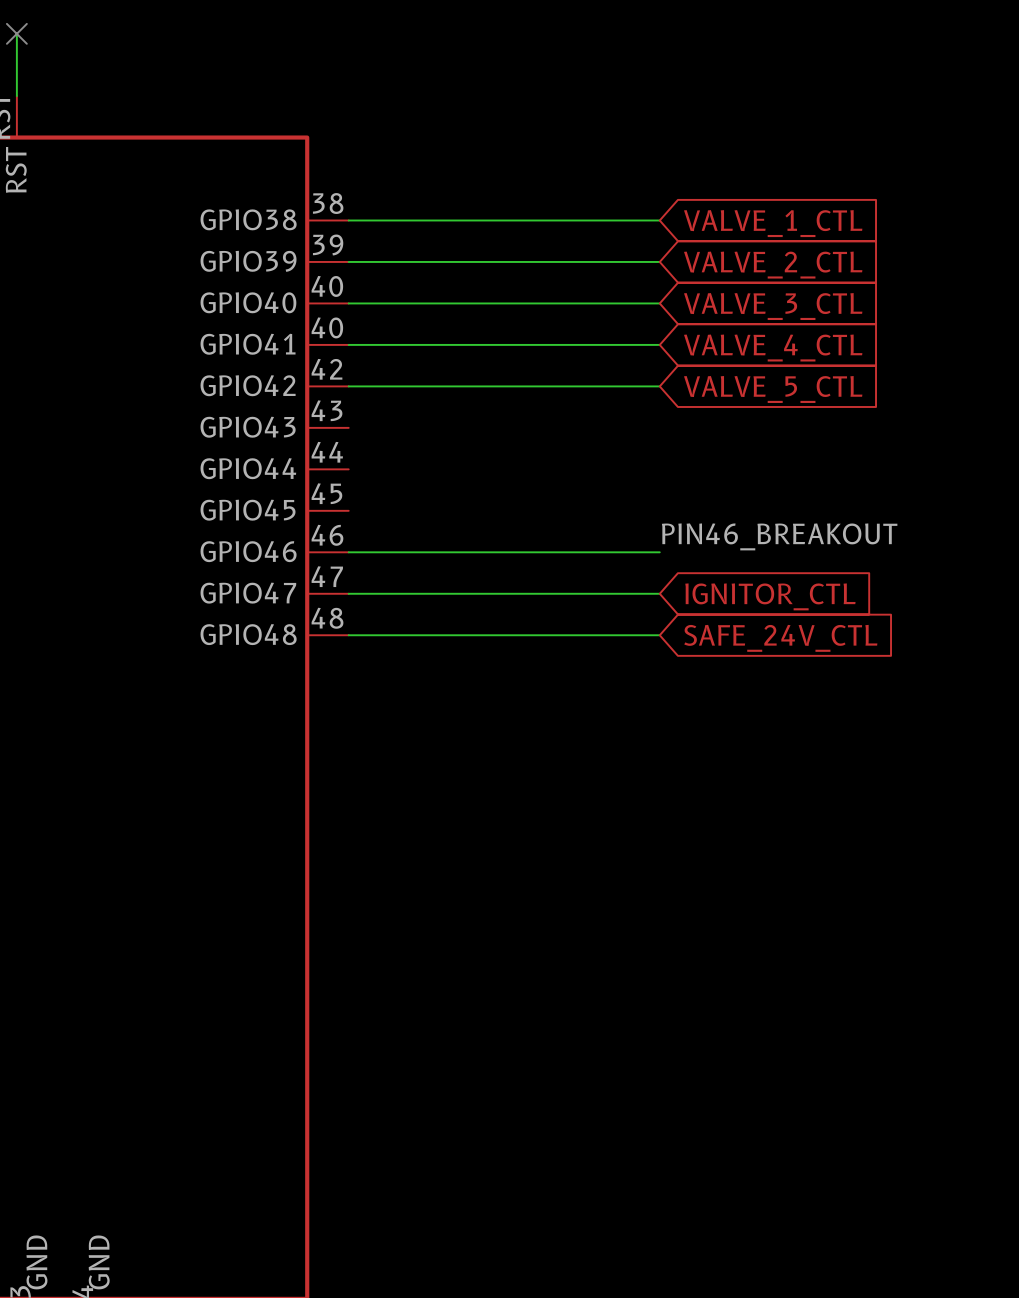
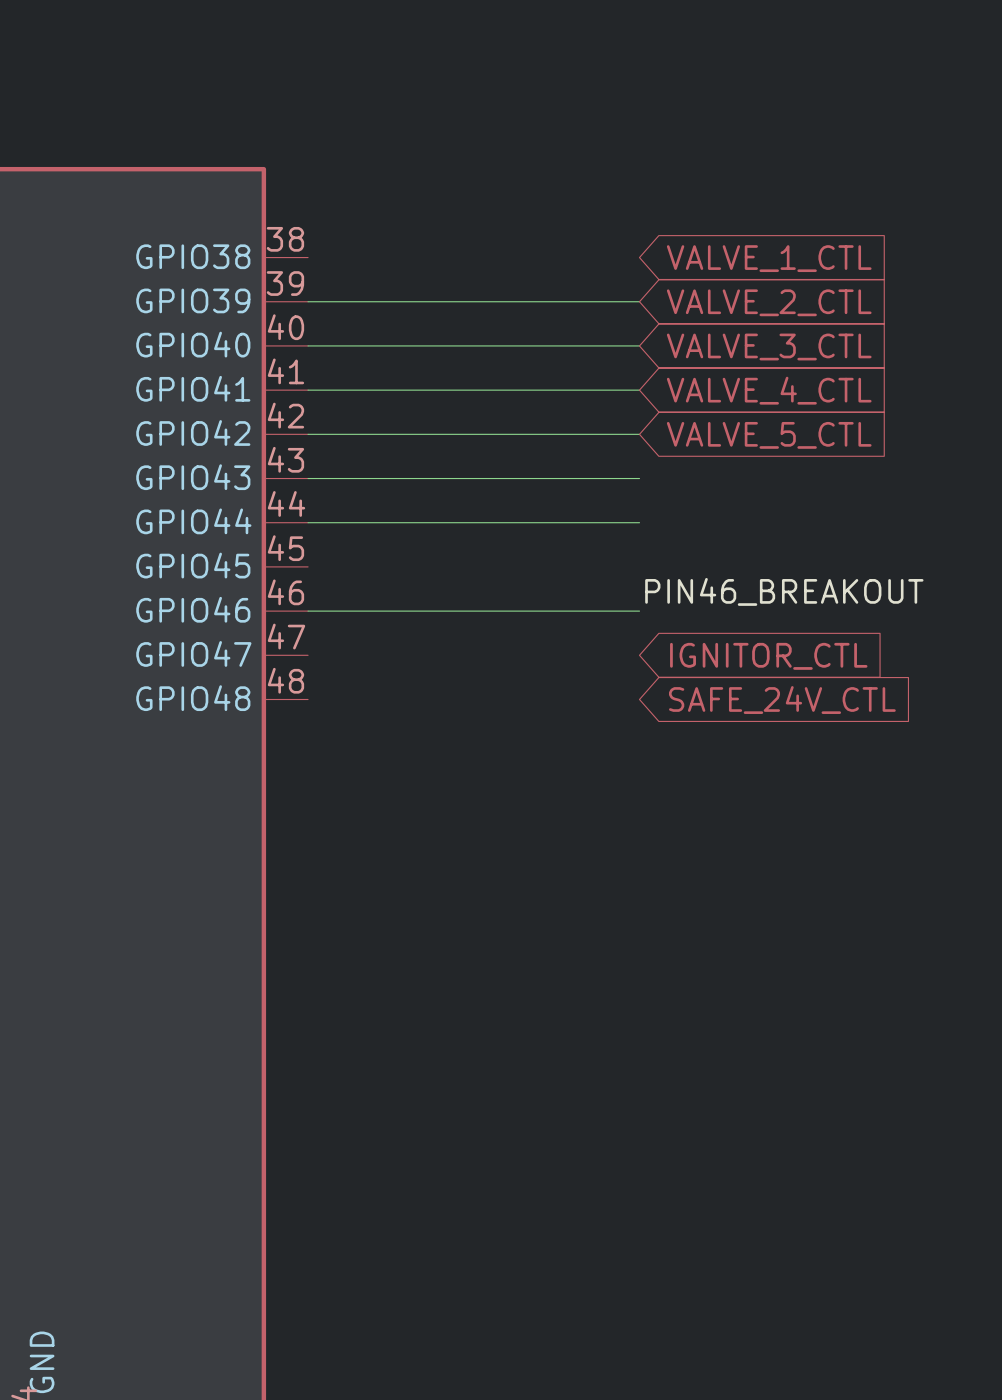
wire: (348, 220) (659, 220) -> none
part pin number: 40 (327, 327) -> 41 (285, 371)
wire: (348, 593) (659, 593) -> (308, 478) (639, 478)
wire: (348, 635) (659, 635) -> (308, 522) (639, 522)

